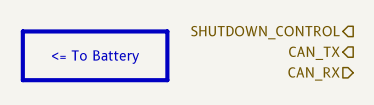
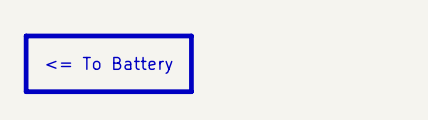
hierarchical label: SHUTDOWN_CONTROL (265, 32) -> none
hierarchical label: CAN_TX (314, 53) -> none
hierarchical label: CAN_RX (314, 73) -> none

